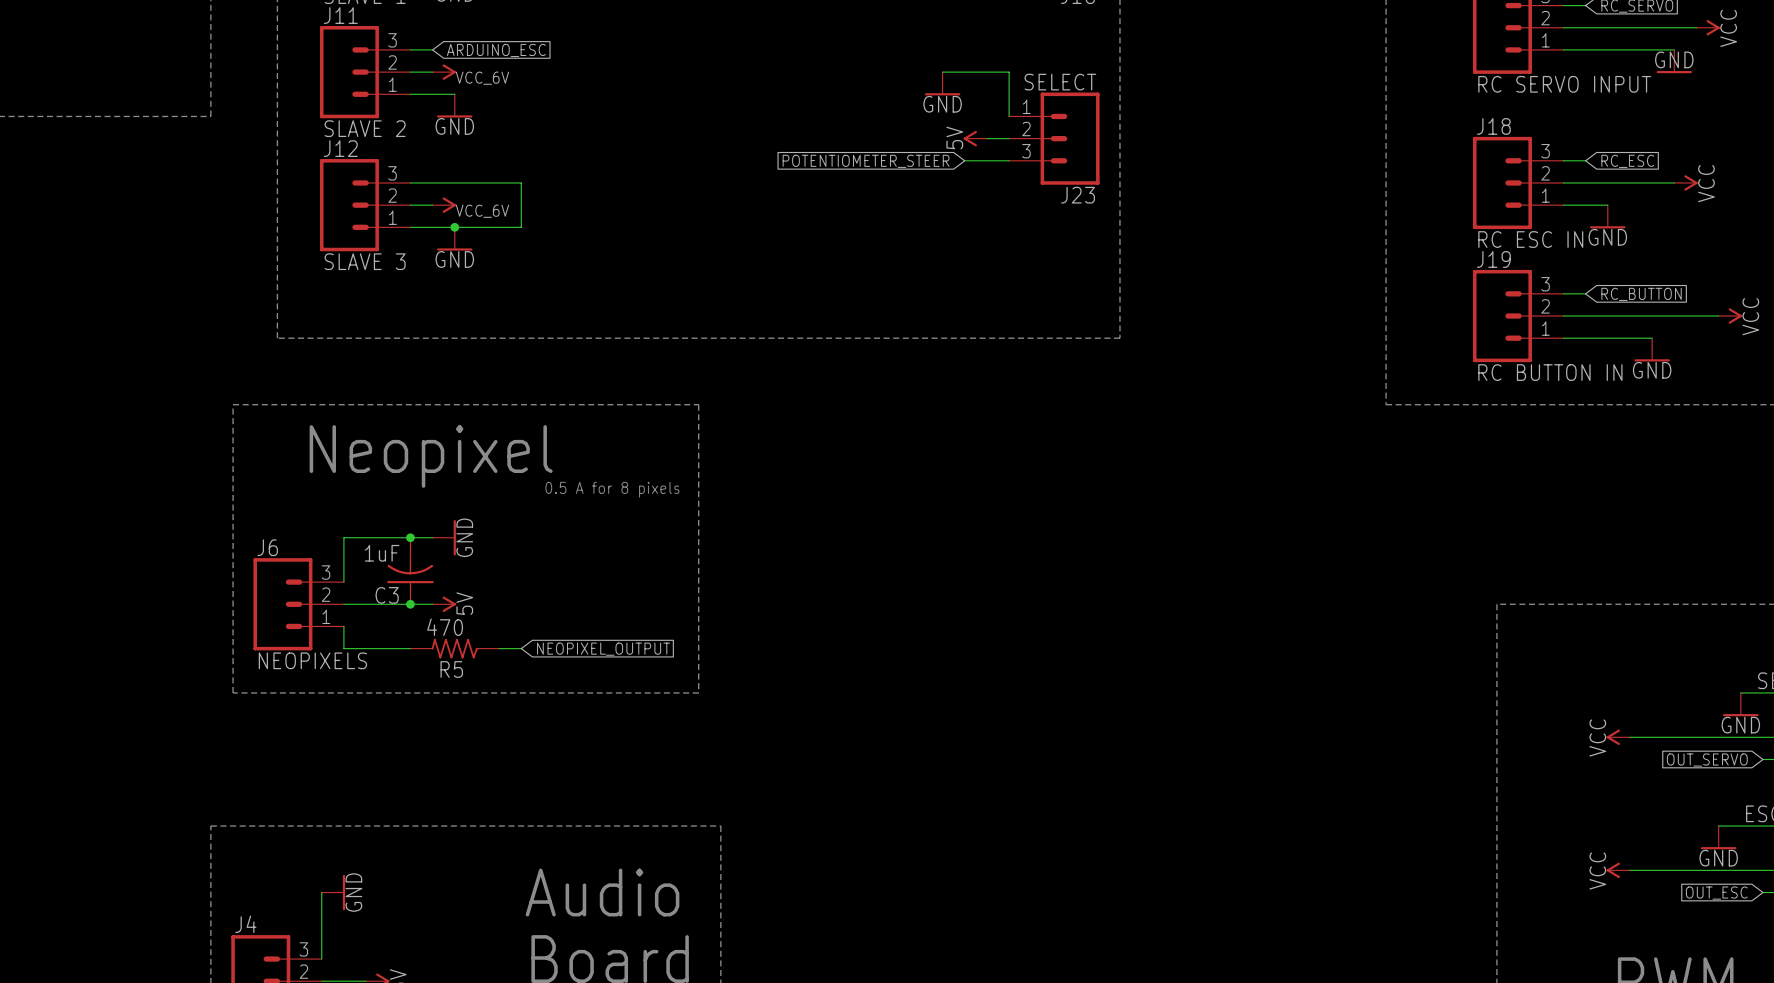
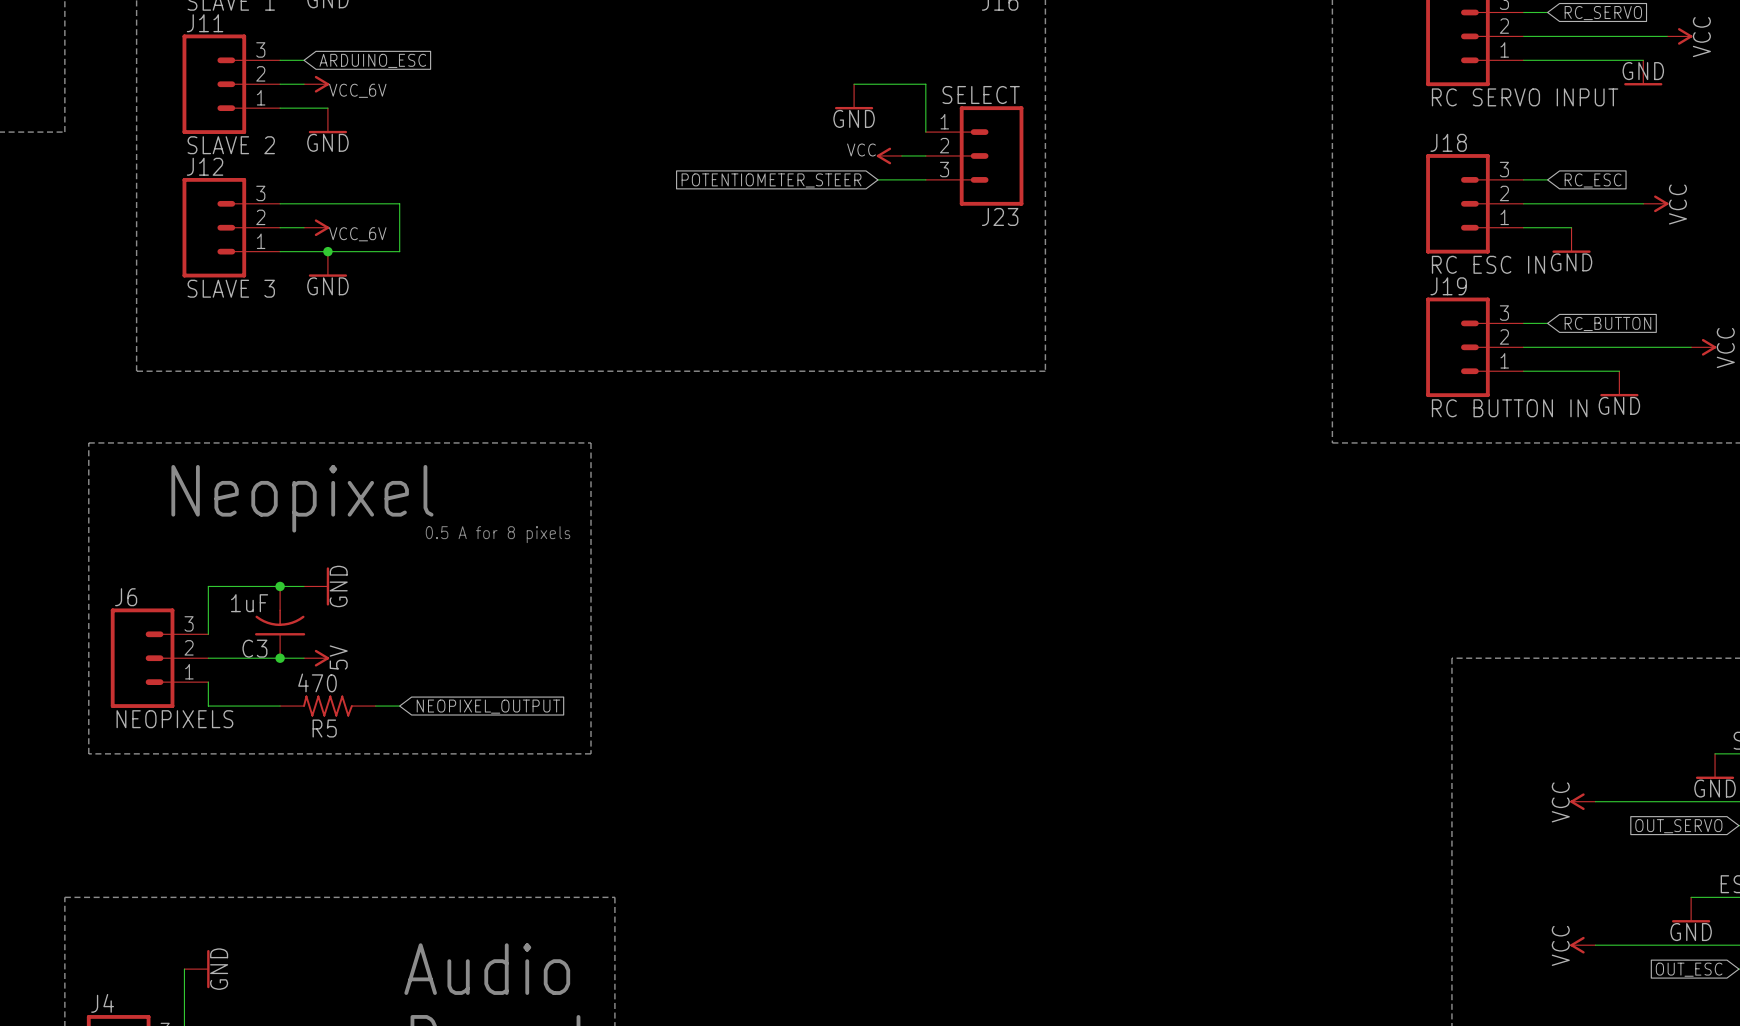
label: none -> VCC (861, 150)
power symbol text: 5V (954, 137) -> none

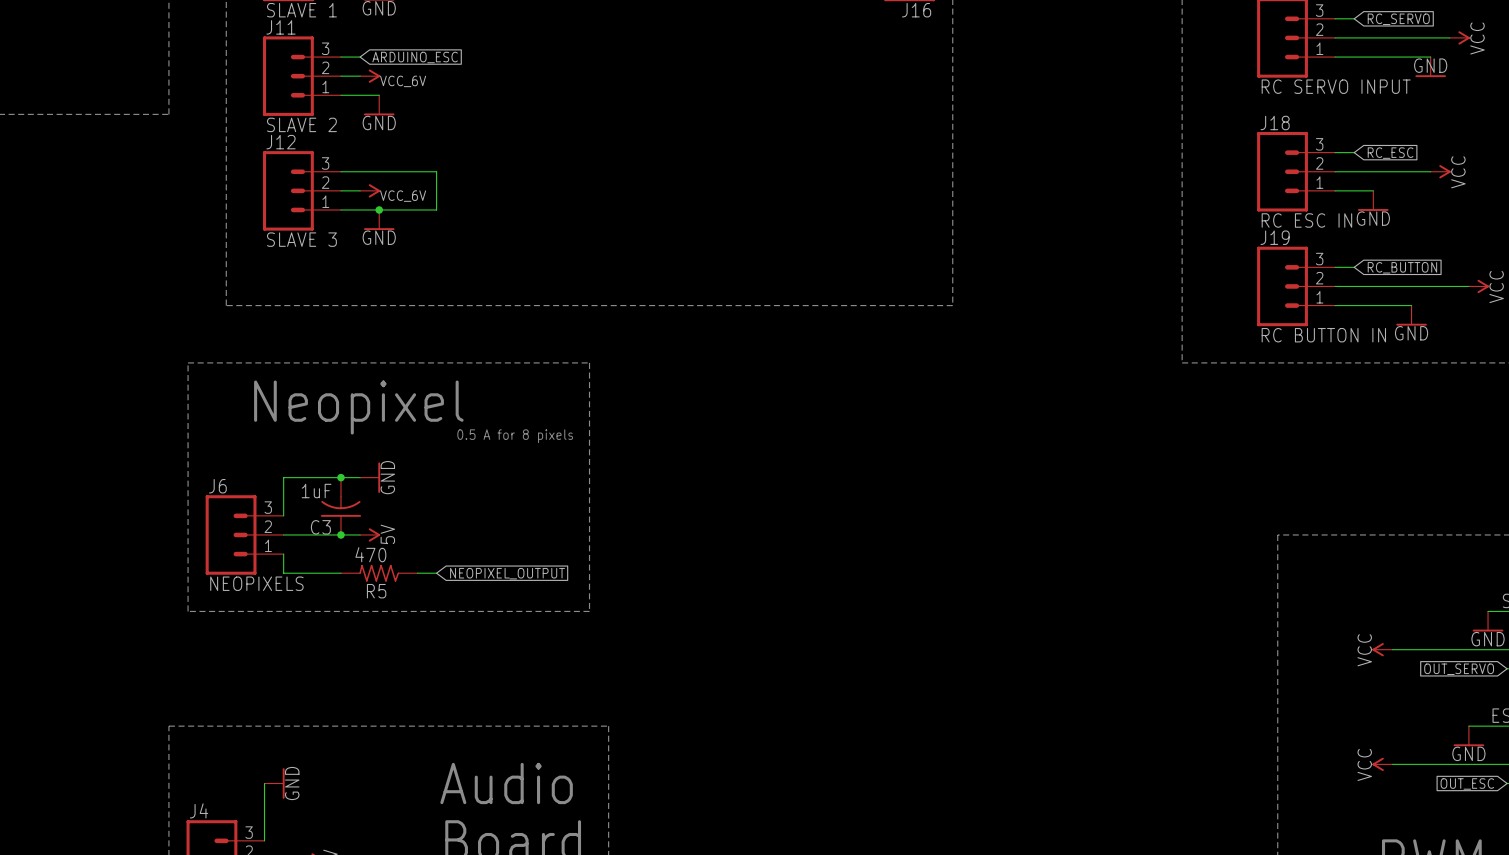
wire: (854, 84) (925, 84) (925, 132) -> none
power symbol: GND (854, 96) -> none
label: VCC (861, 150) -> none
power symbol: (889, 155) -> none
wire: (901, 155) (925, 155) -> none
J23: SELECT (974, 155) -> none
wire: (877, 179) (925, 179) -> none
global label: POTENTIOMETER_STEER (771, 180) -> none

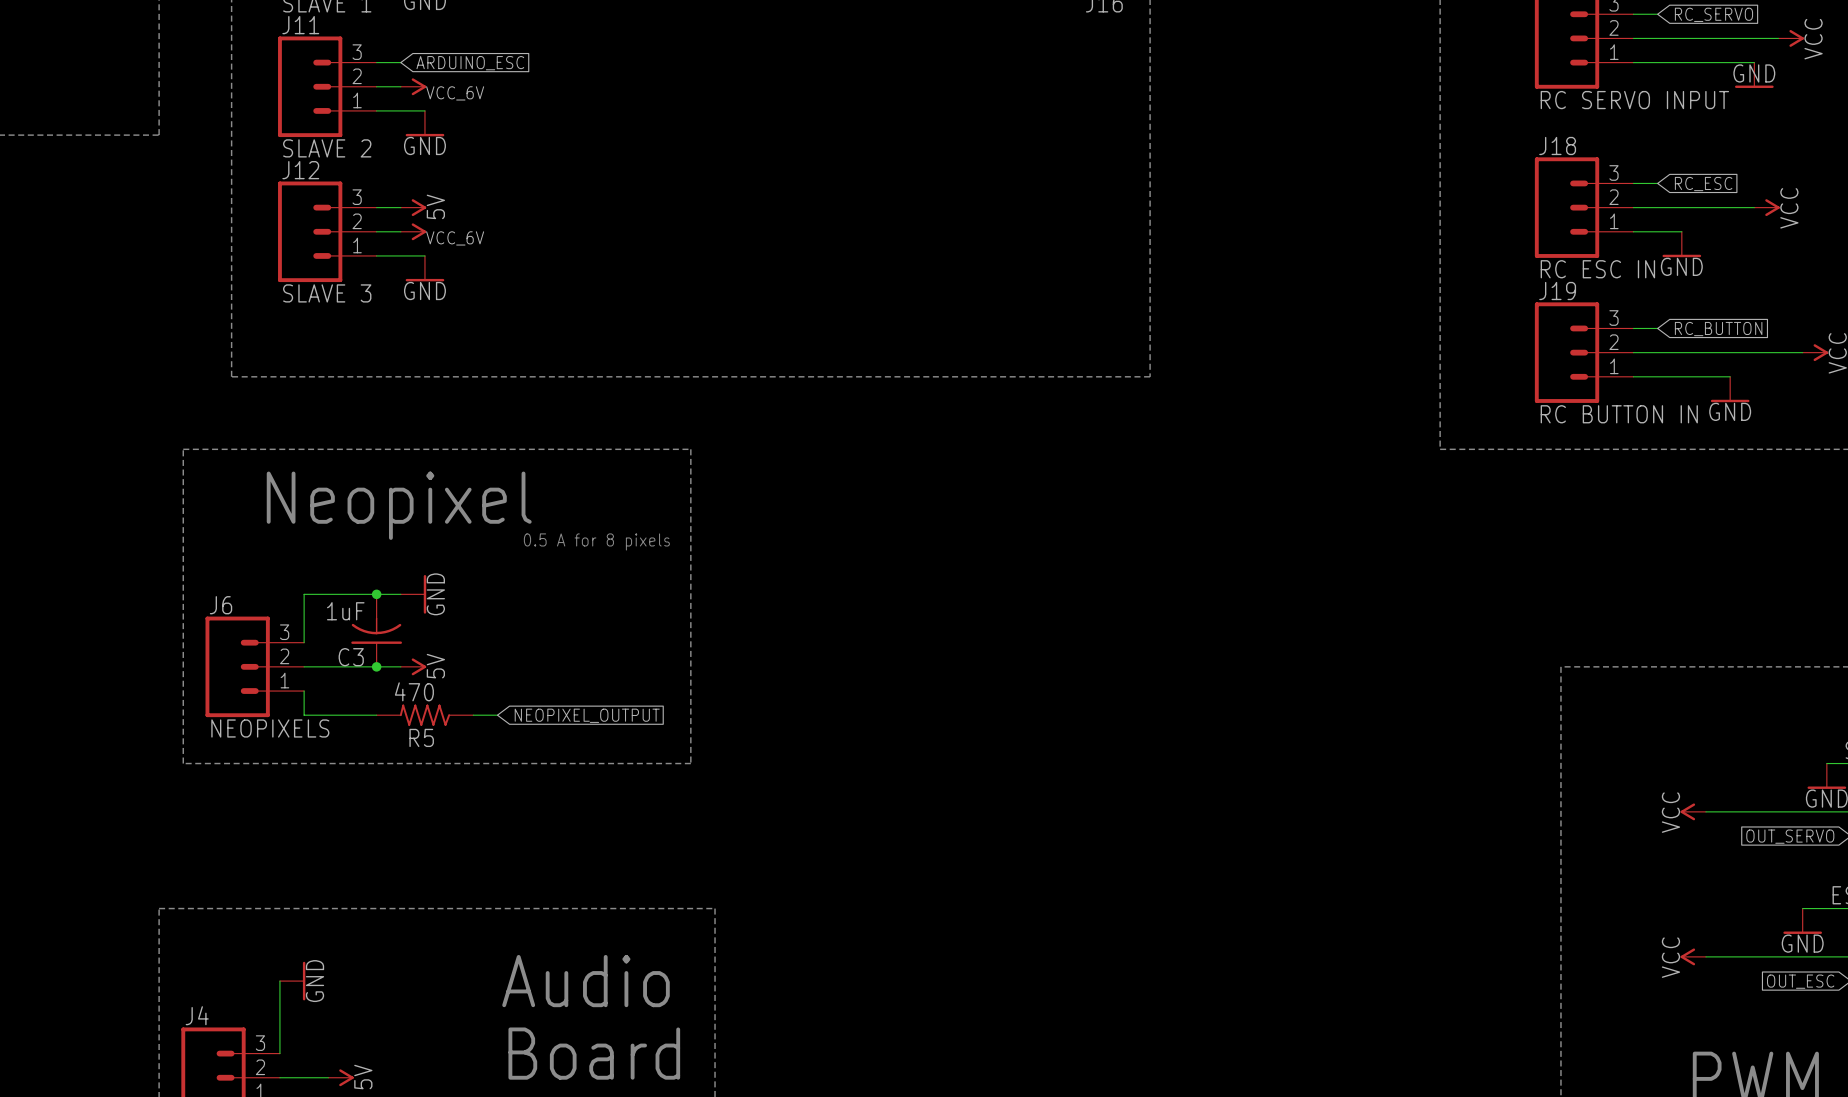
wire: (360, 171) (436, 171) (436, 209) (379, 209) -> none
power symbol: none -> 5V (413, 207)
junction: (379, 209) -> none

